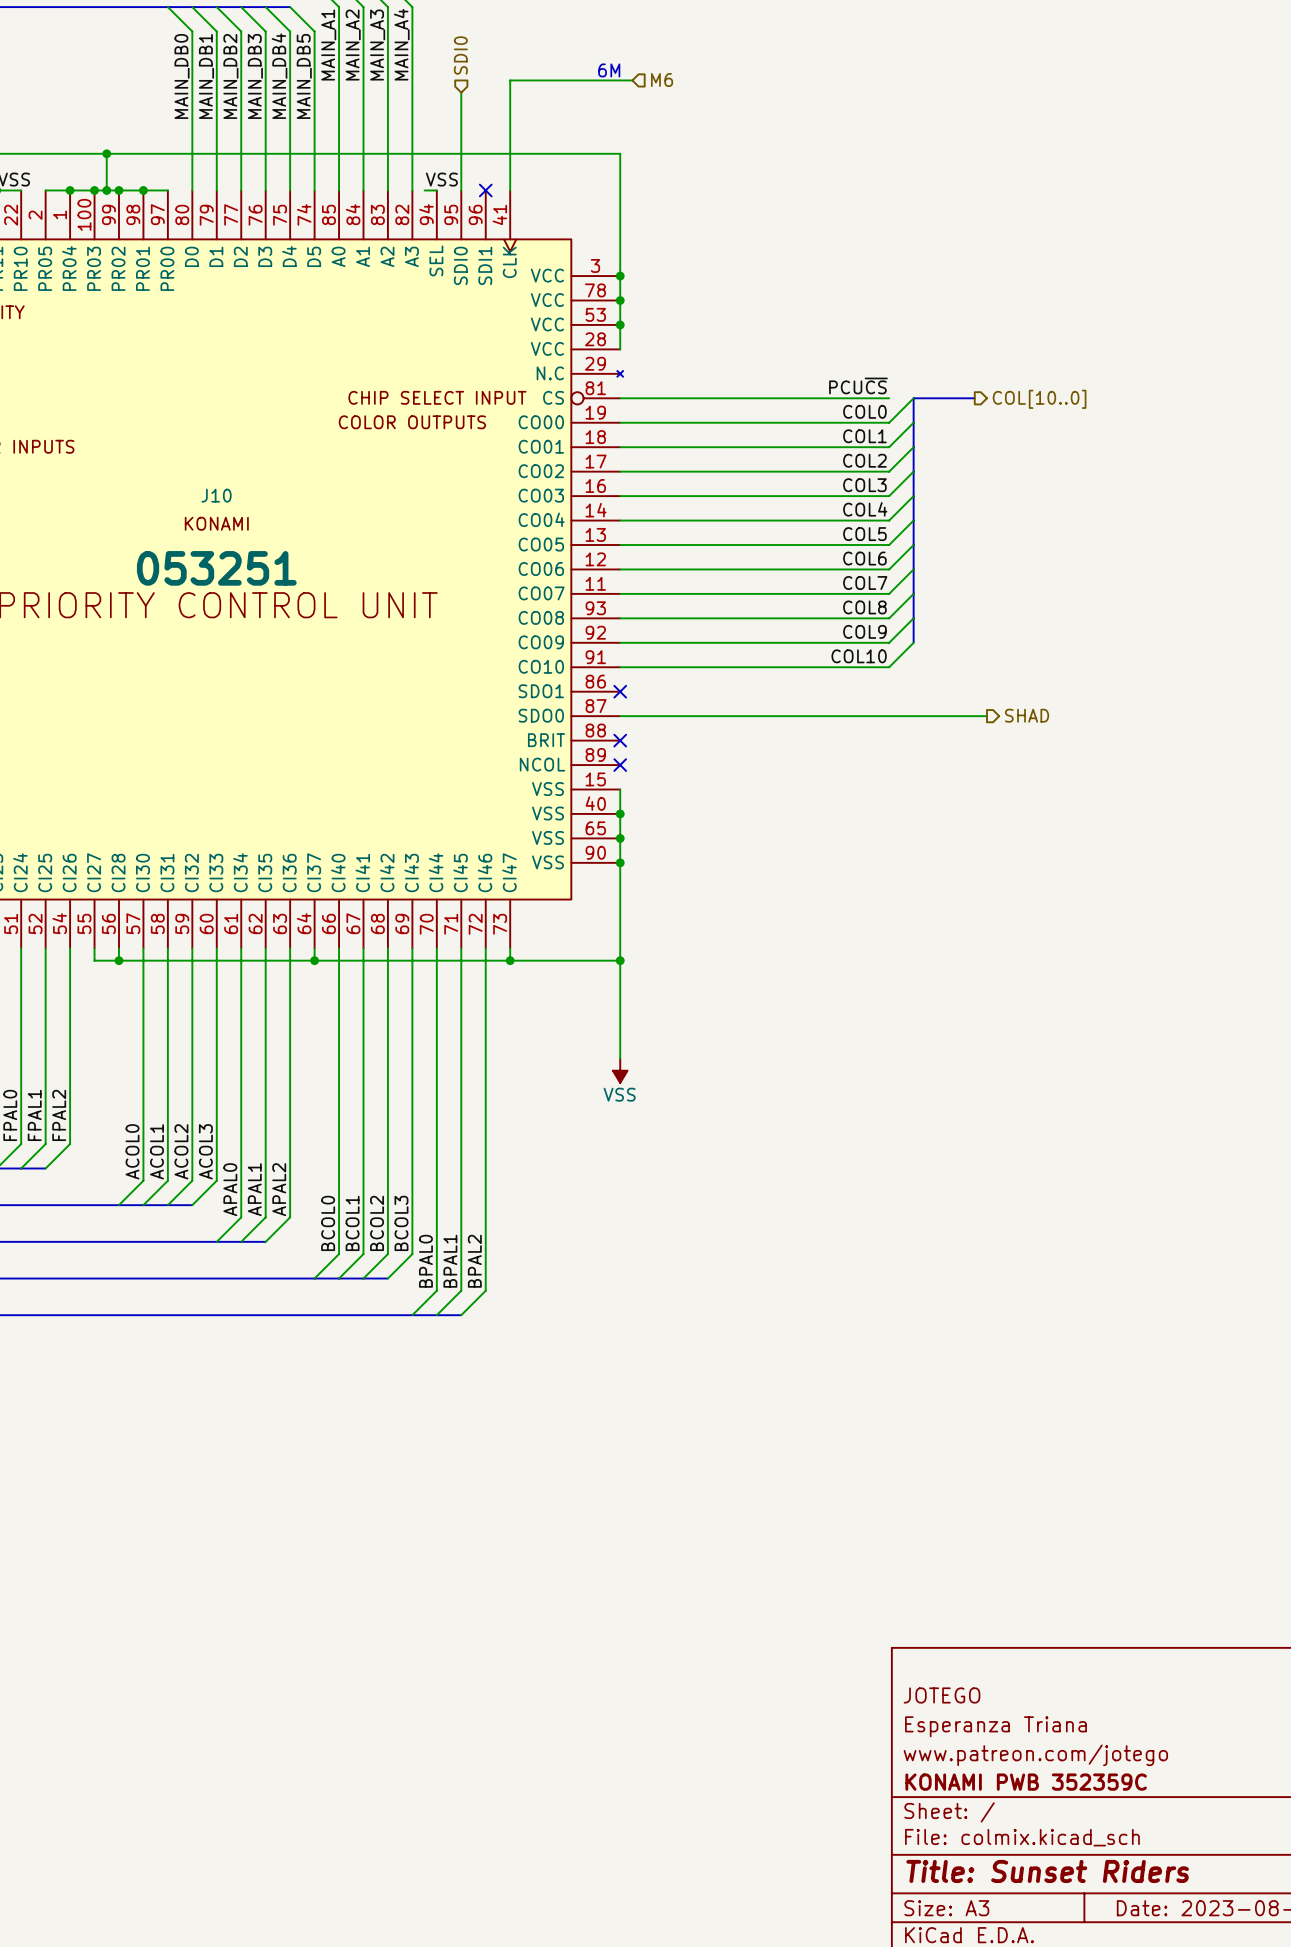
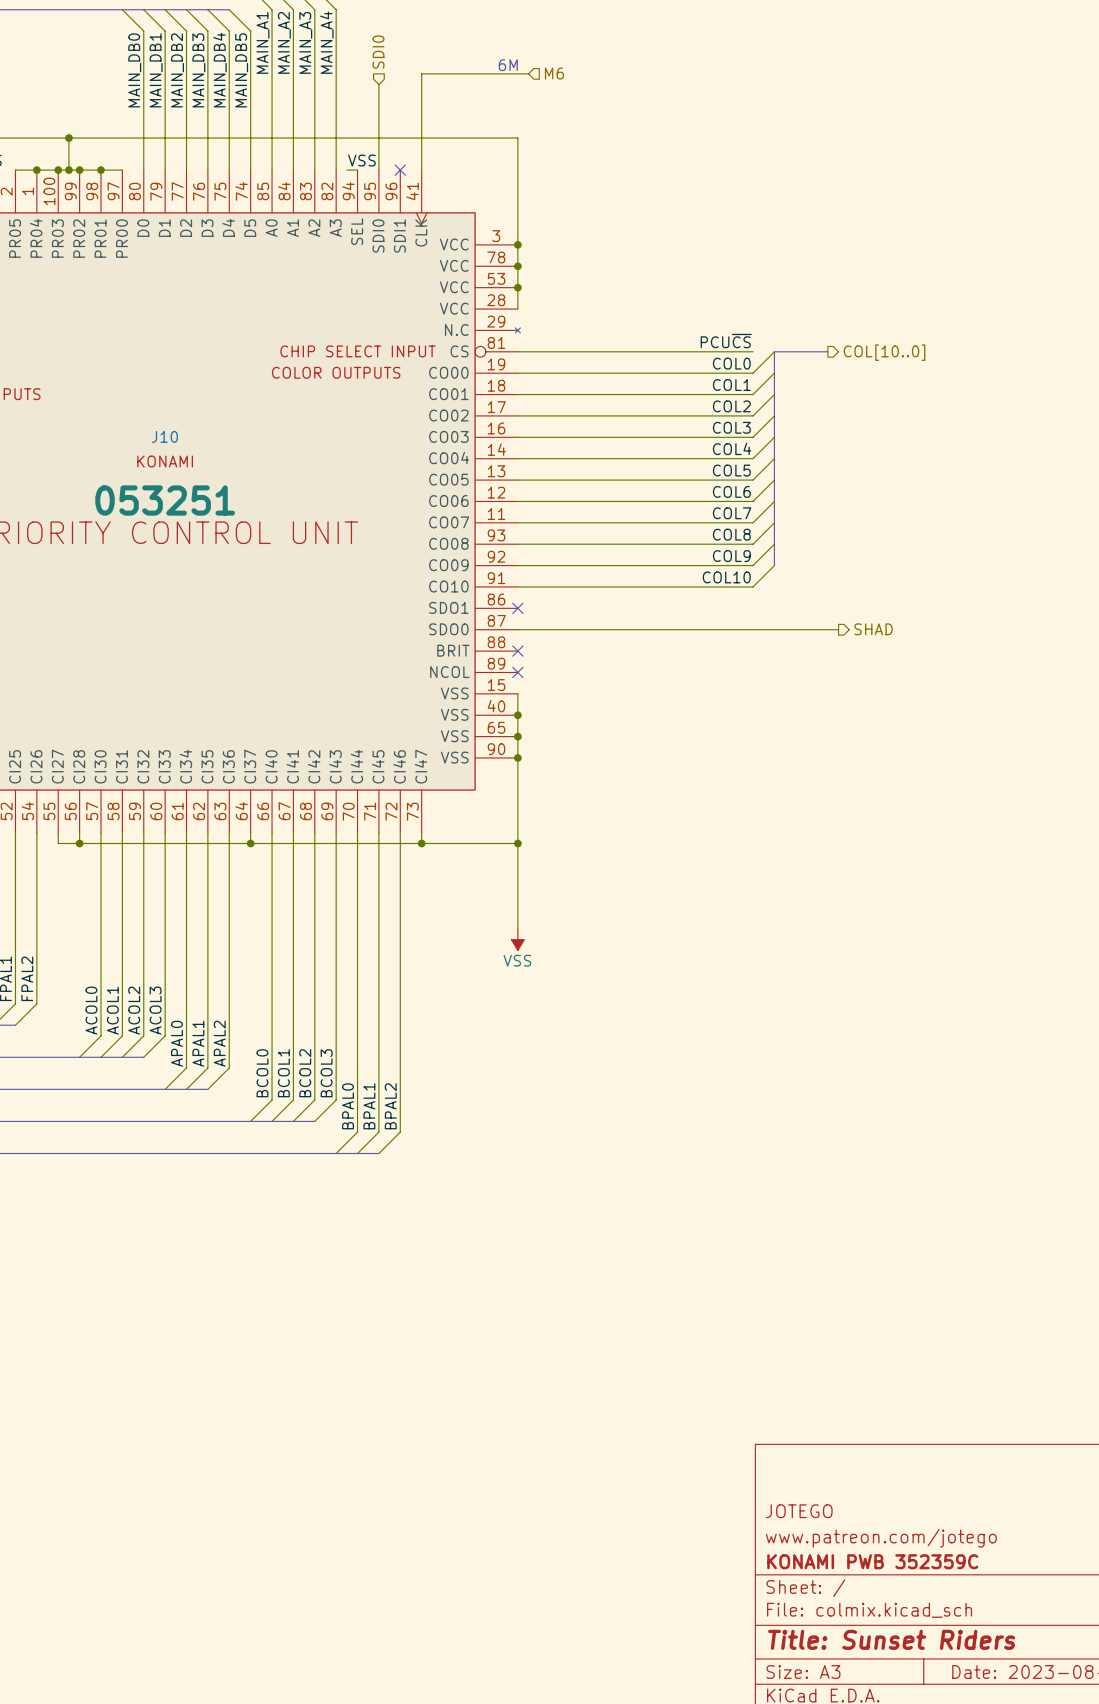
title block: JOTEGO (942, 1695) -> none
title block: Esperanza Triana (995, 1726) -> JOTEGO (799, 1511)

